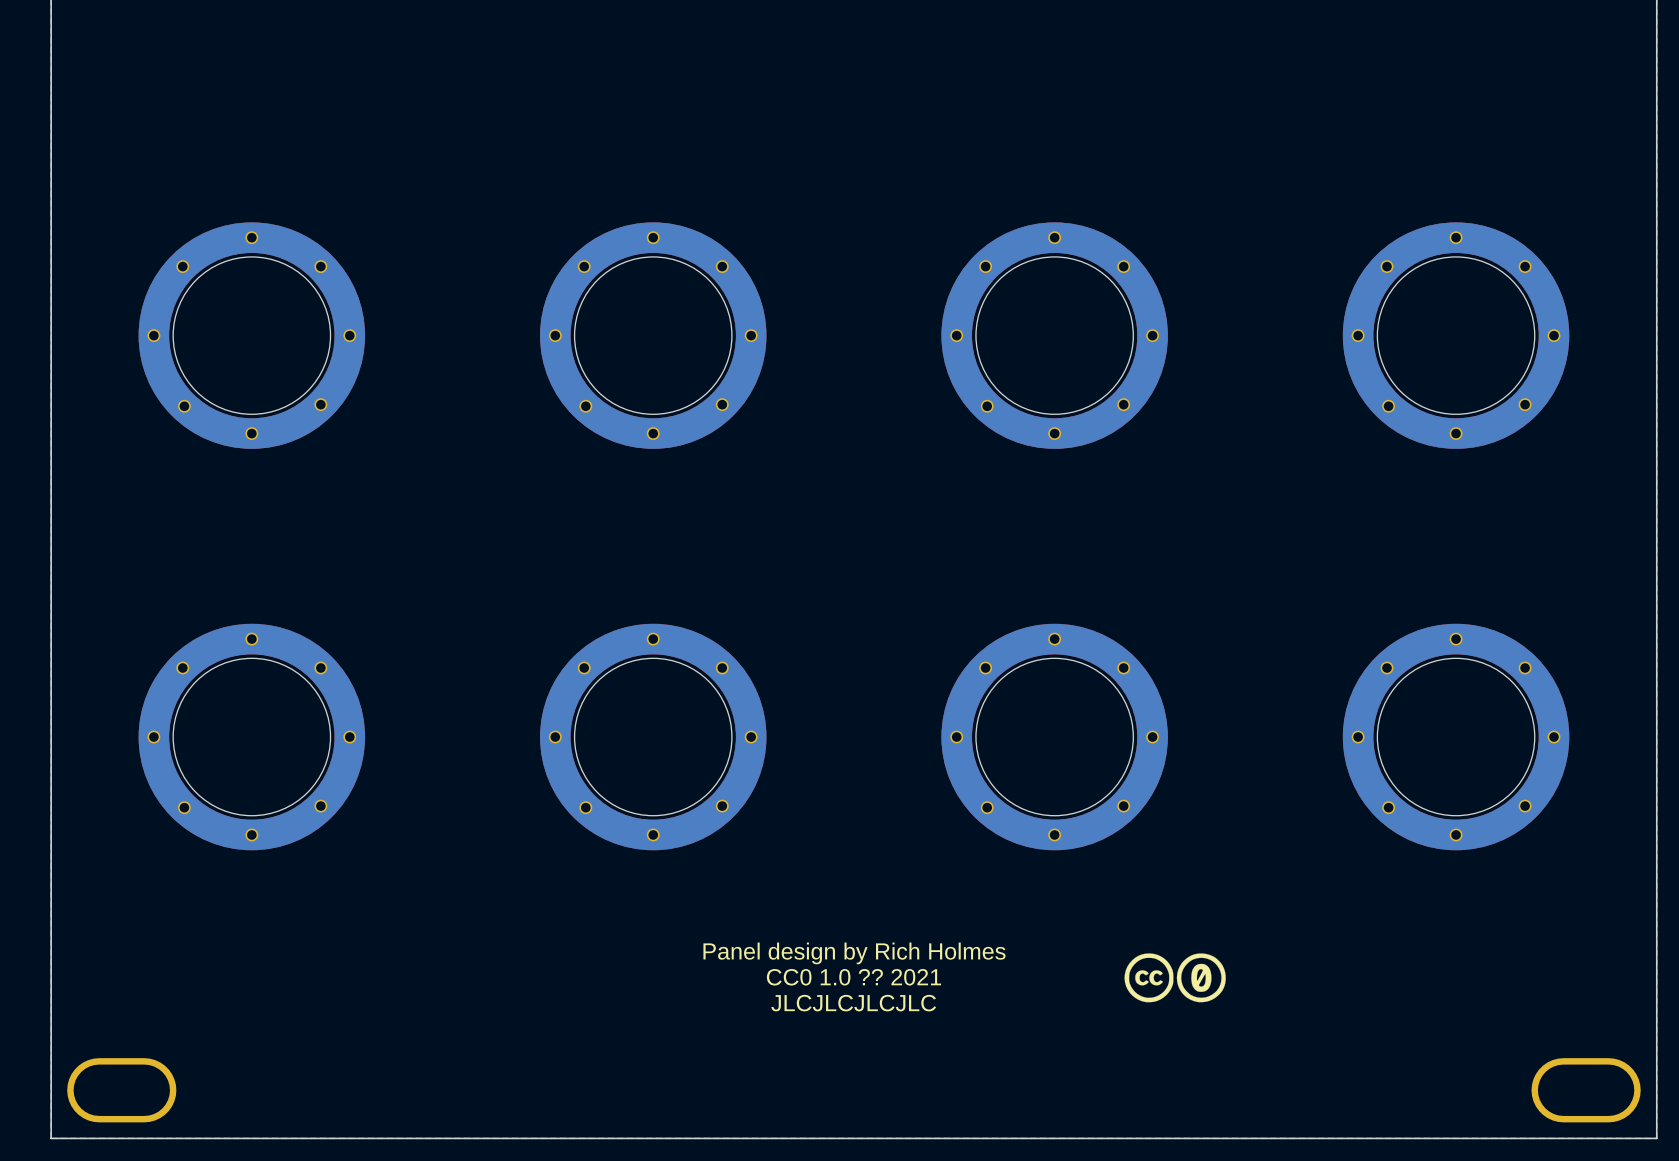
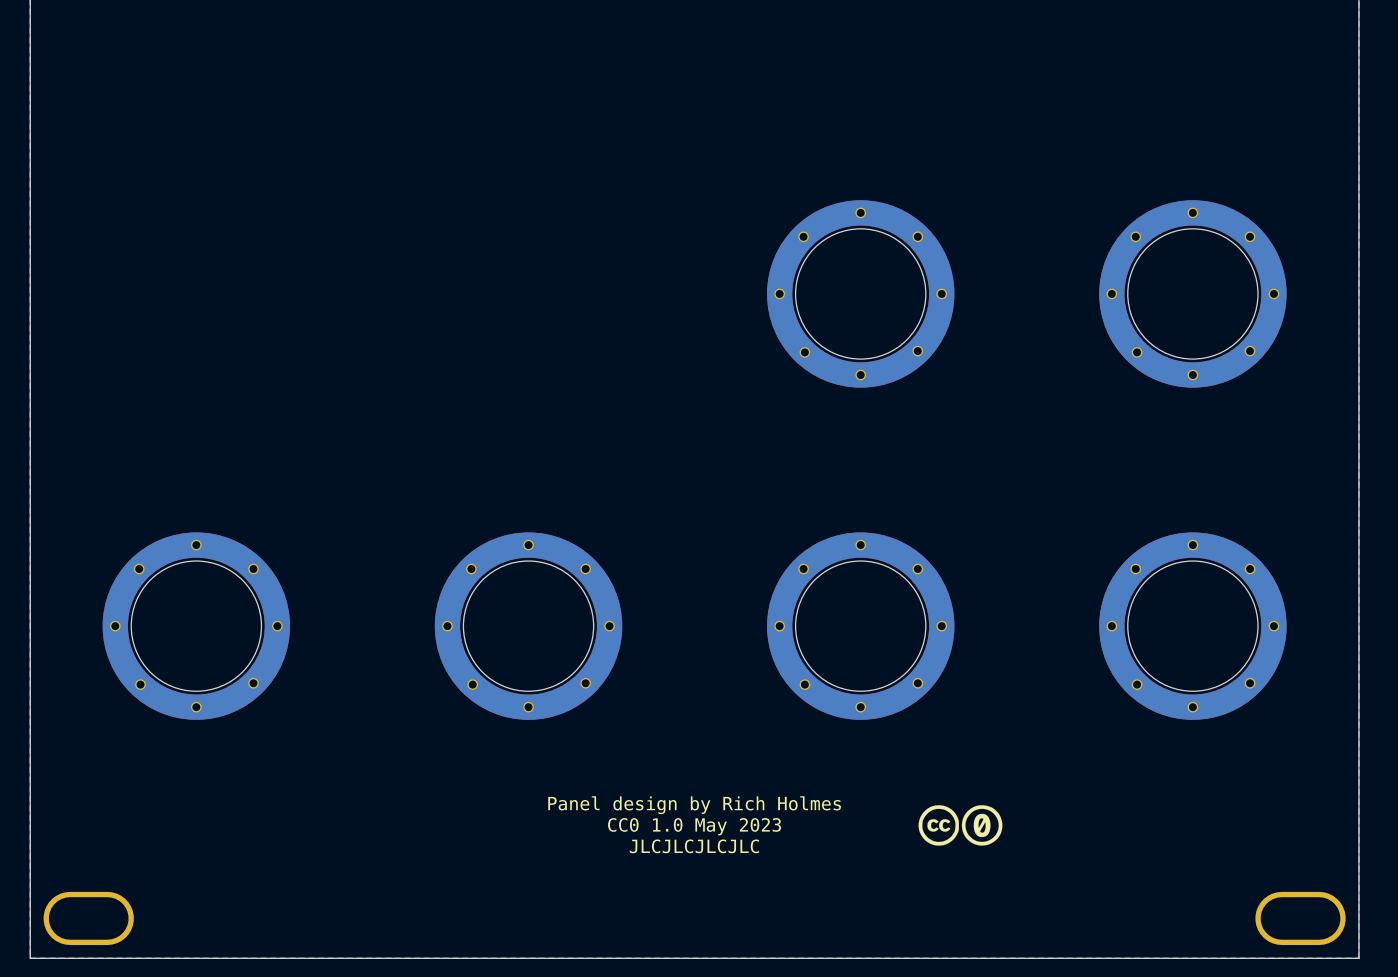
part: (251, 335) -> none
part: (653, 335) -> none
text: CC0 1.0 ?? 2021 (853, 977) -> CC0 1.0 May 2023 (694, 826)

